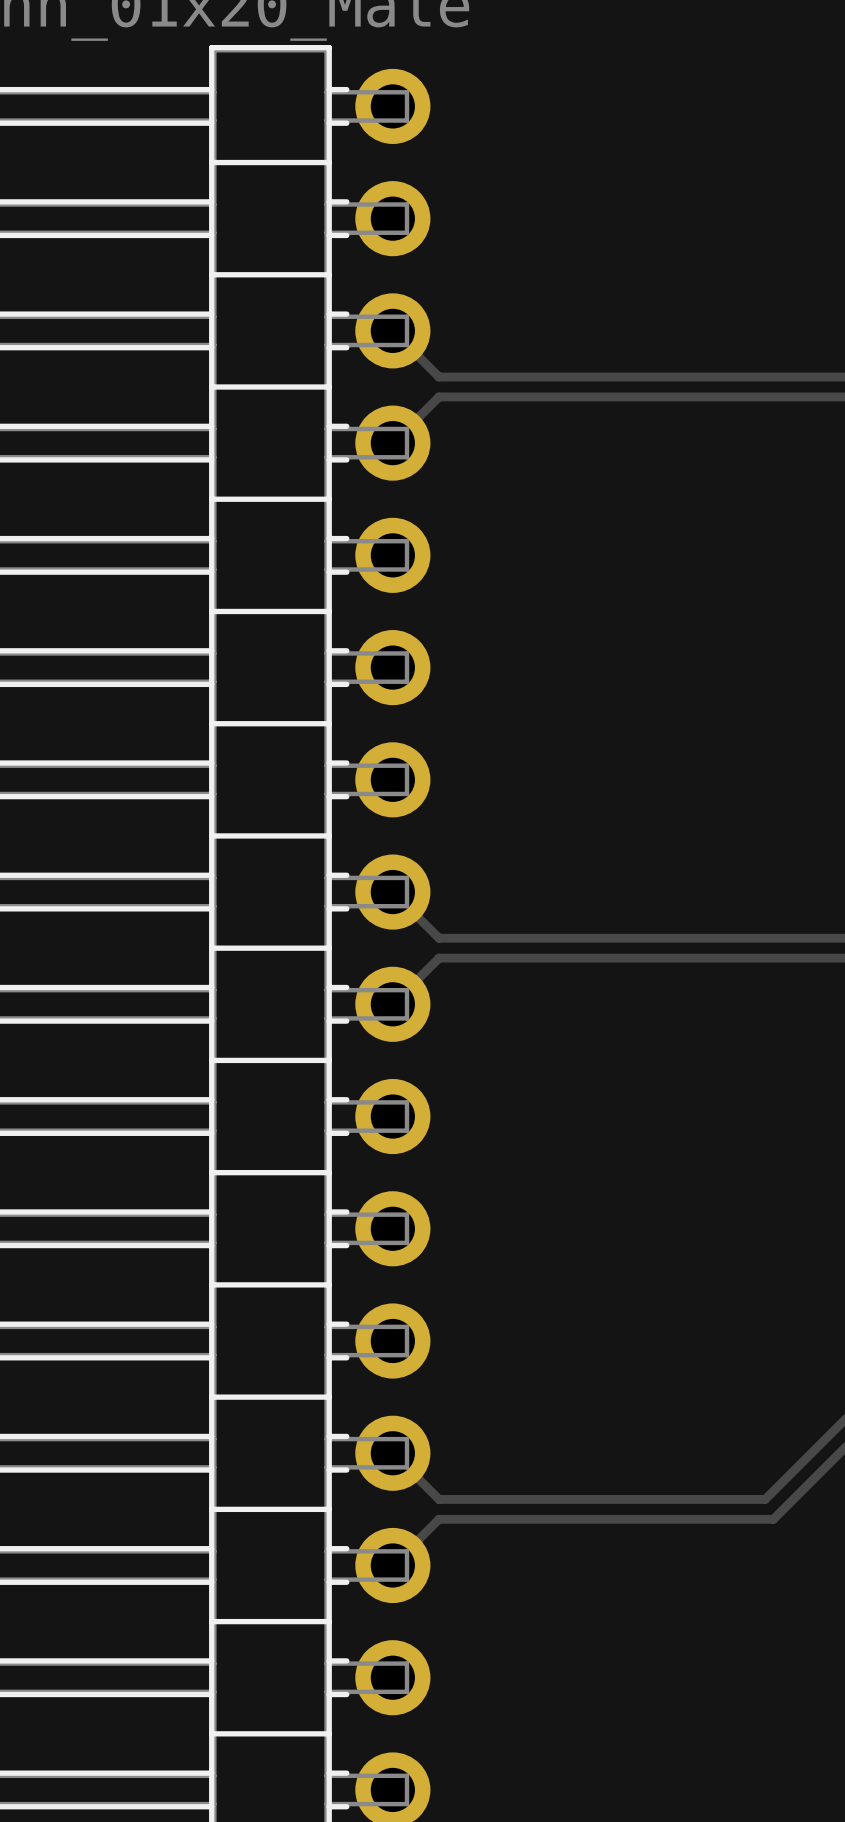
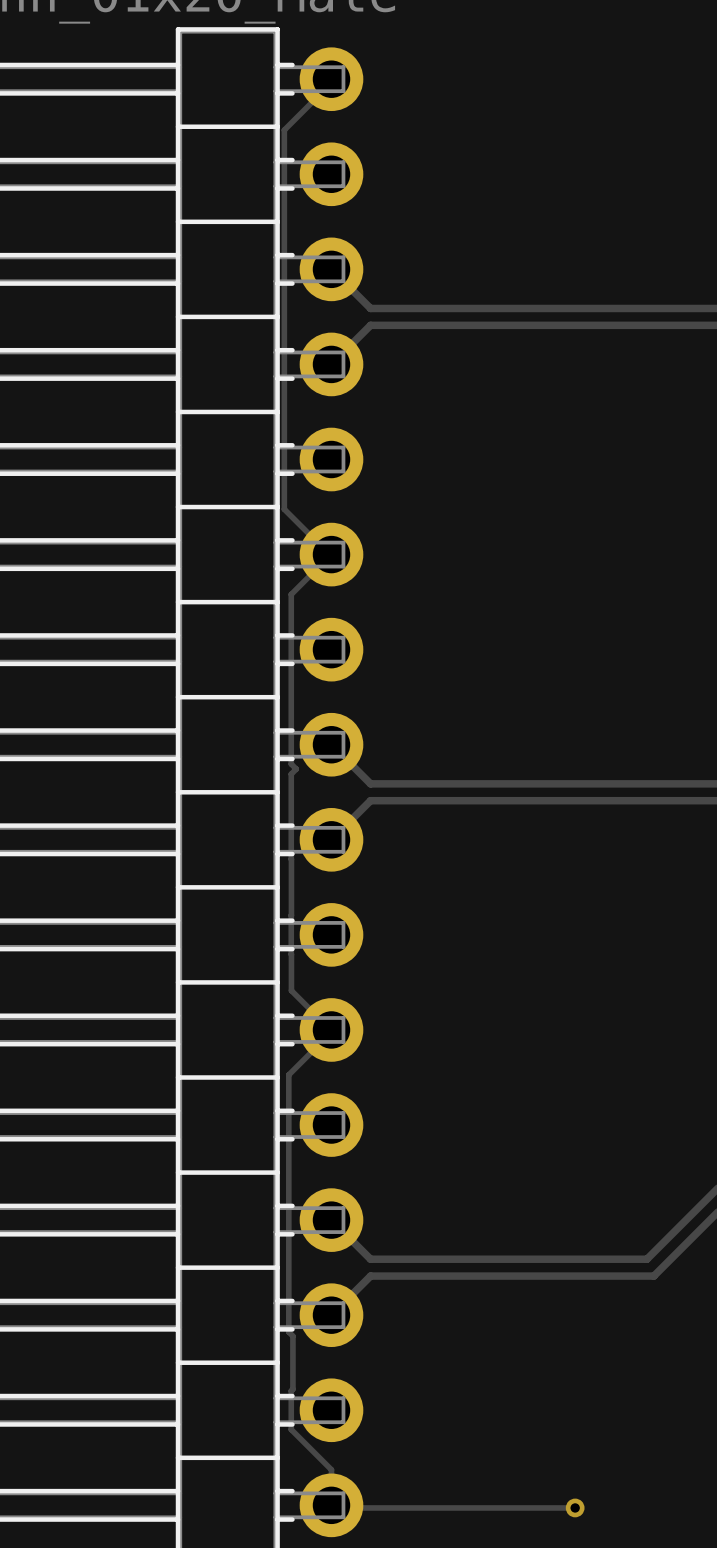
track: none -> (340, 73) (284, 130) (284, 509) (330, 555)
track: none -> (331, 554) (291, 594) (291, 764) (296, 769) (291, 774) (291, 990) (332, 1031) (288, 1074) (288, 1332) (292, 1336) (291, 1429) (331, 1469) (331, 1505) (337, 1509)
track: none -> (575, 1507) (338, 1507) (335, 1511)
via: none -> (575, 1507)

